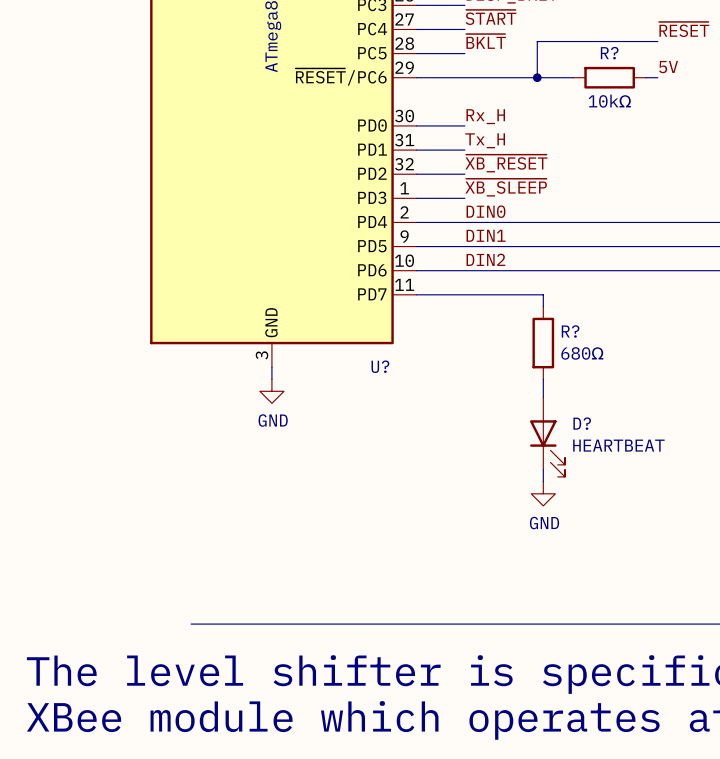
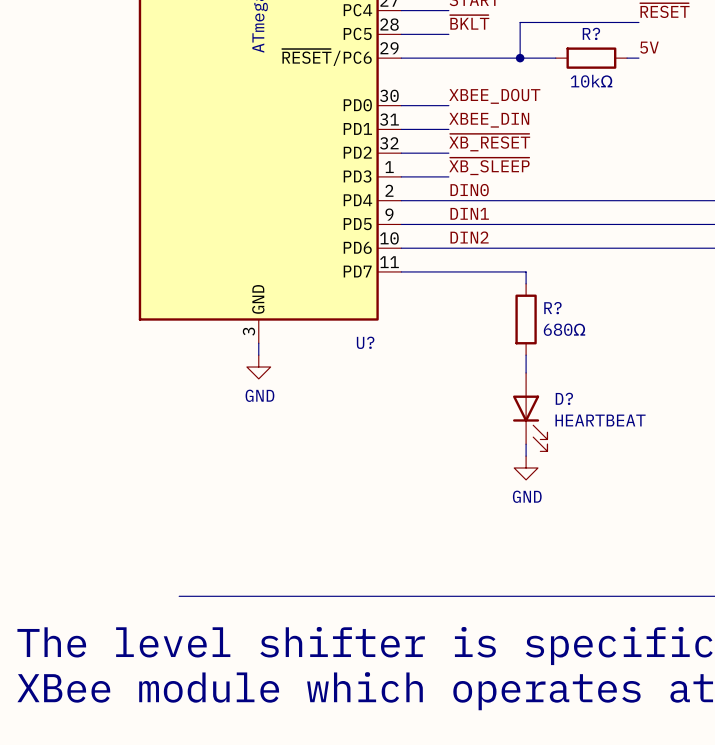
label: Rx_H (485, 116) -> XBEE_DOUT (494, 96)
label: Tx_H (485, 140) -> XBEE_DIN (489, 120)

